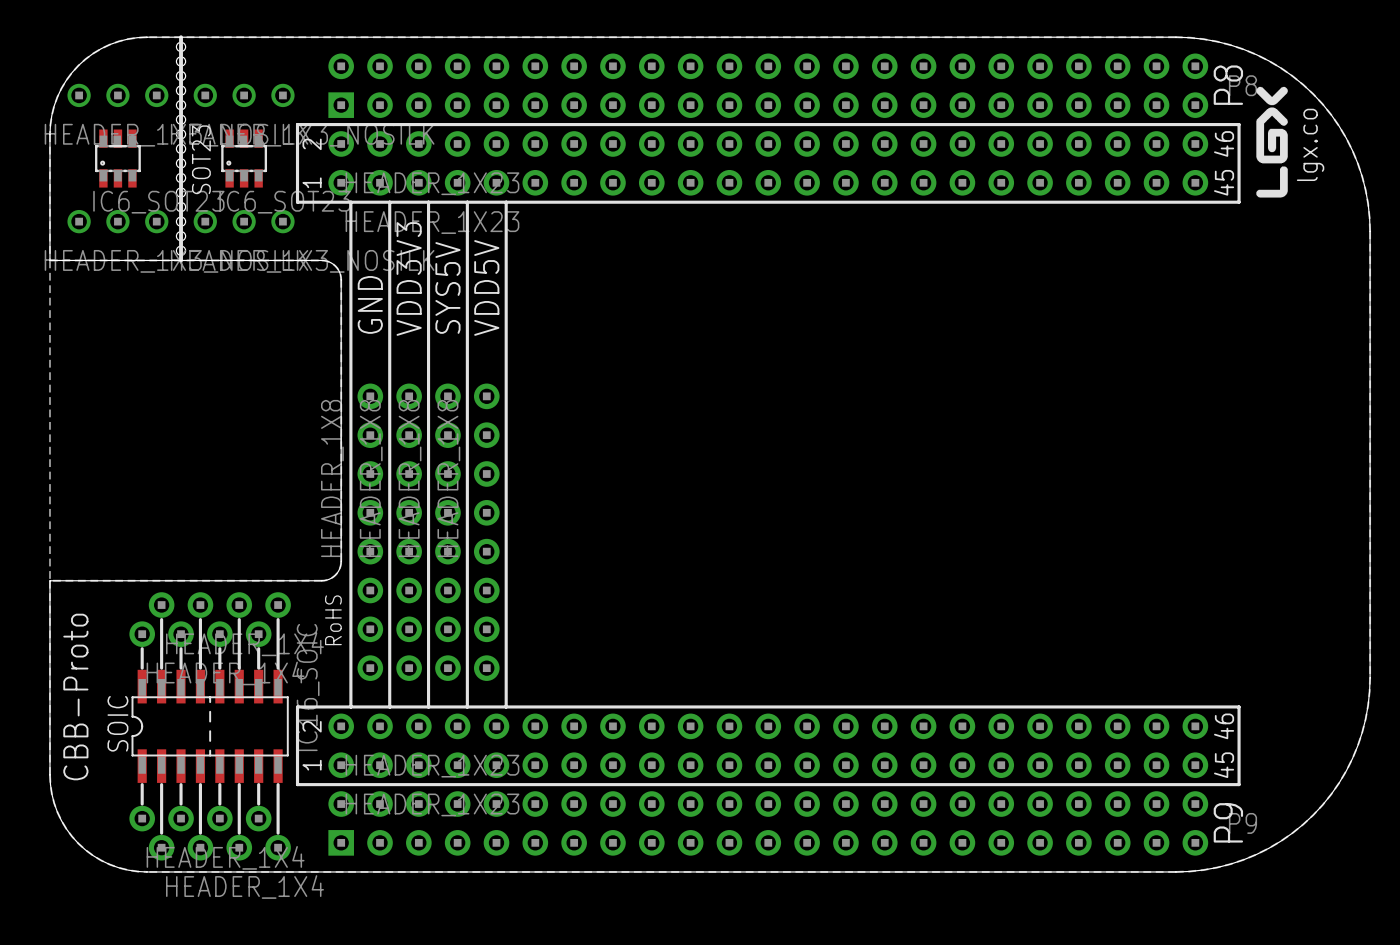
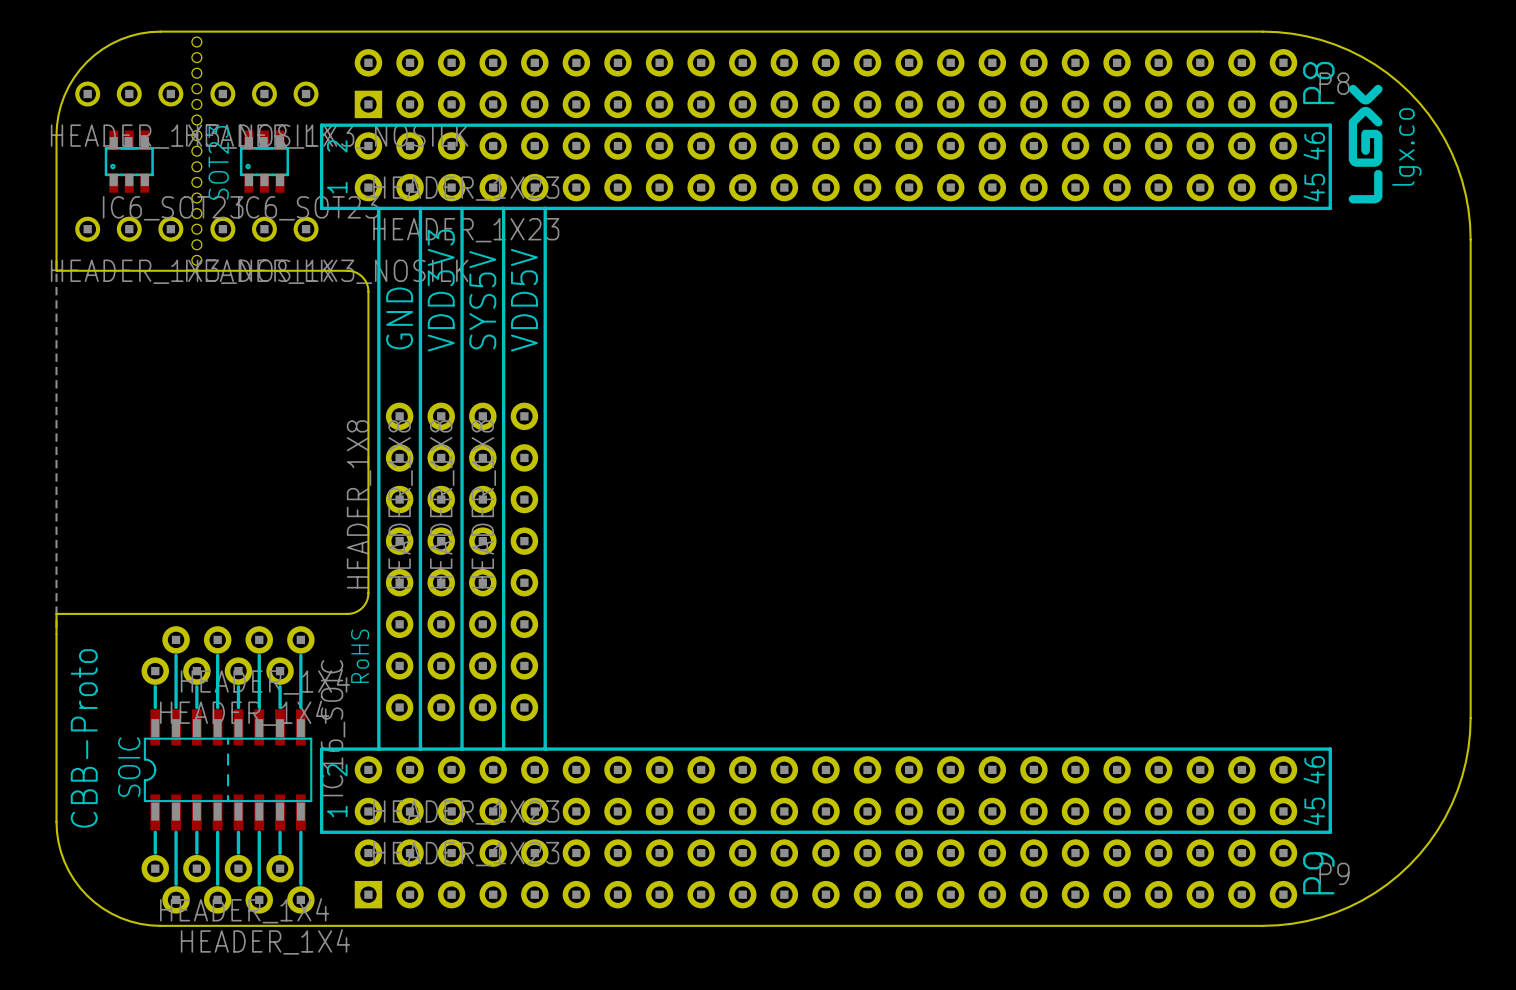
part footprint: [49, 36, 1372, 873] -> [55, 30, 1472, 927]
board edge: (147, 37) (1175, 37) (1203, 39) (1230, 45) (1256, 54) (1280, 68) (1313, 94) (1331, 114) (1346, 138) (1362, 176) (1369, 217) (1369, 691) (1365, 719) (1357, 745) (1339, 782) (1313, 815) (1292, 833) (1268, 848) (1230, 864) (1189, 871) (147, 871) (118, 867) (93, 855) (78, 843) (66, 828) (57, 812) (51, 793) (49, 774) (49, 580) (321, 580) (333, 576) (341, 563) (341, 279) (335, 266) (321, 260) (49, 260) (49, 134) (51, 115) (57, 97) (72, 72) (93, 53) (118, 41) (147, 37) -> none
line: (181, 37) (181, 260) -> none

